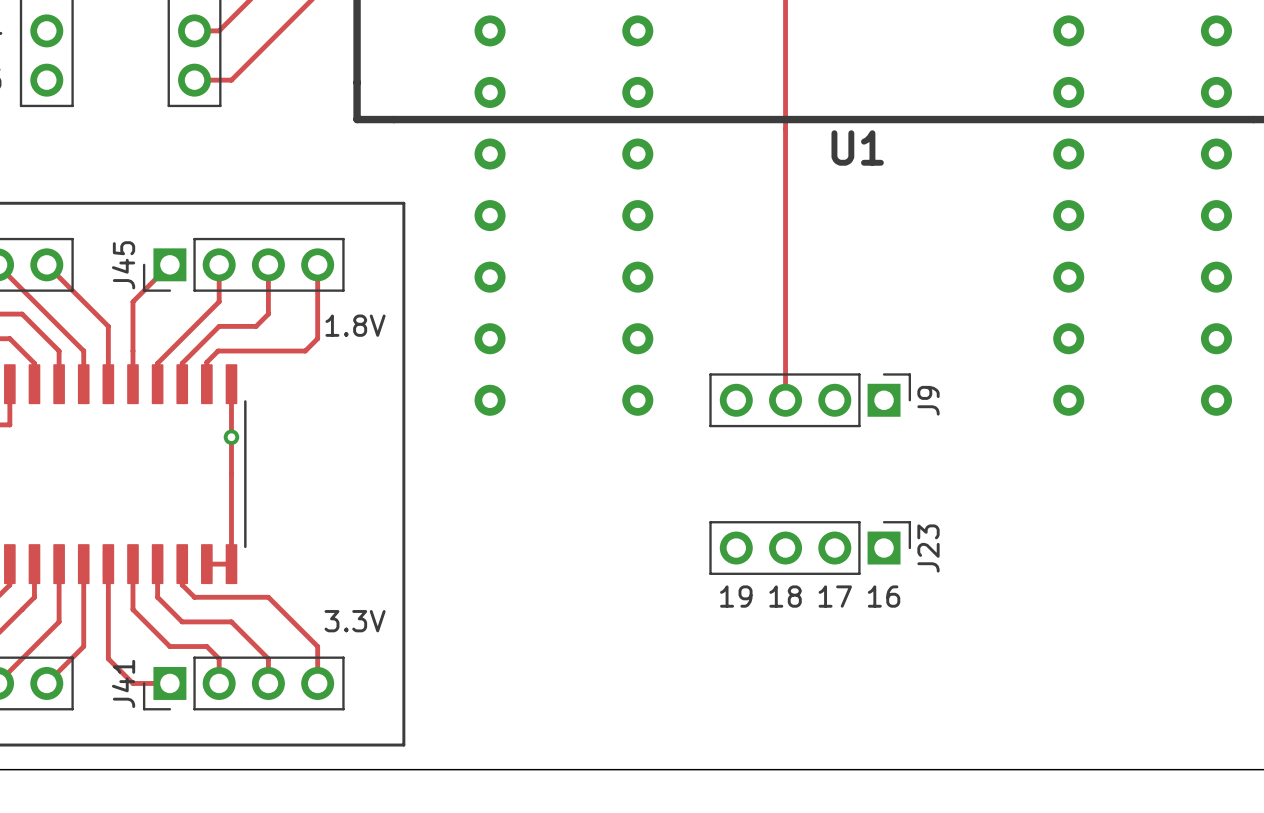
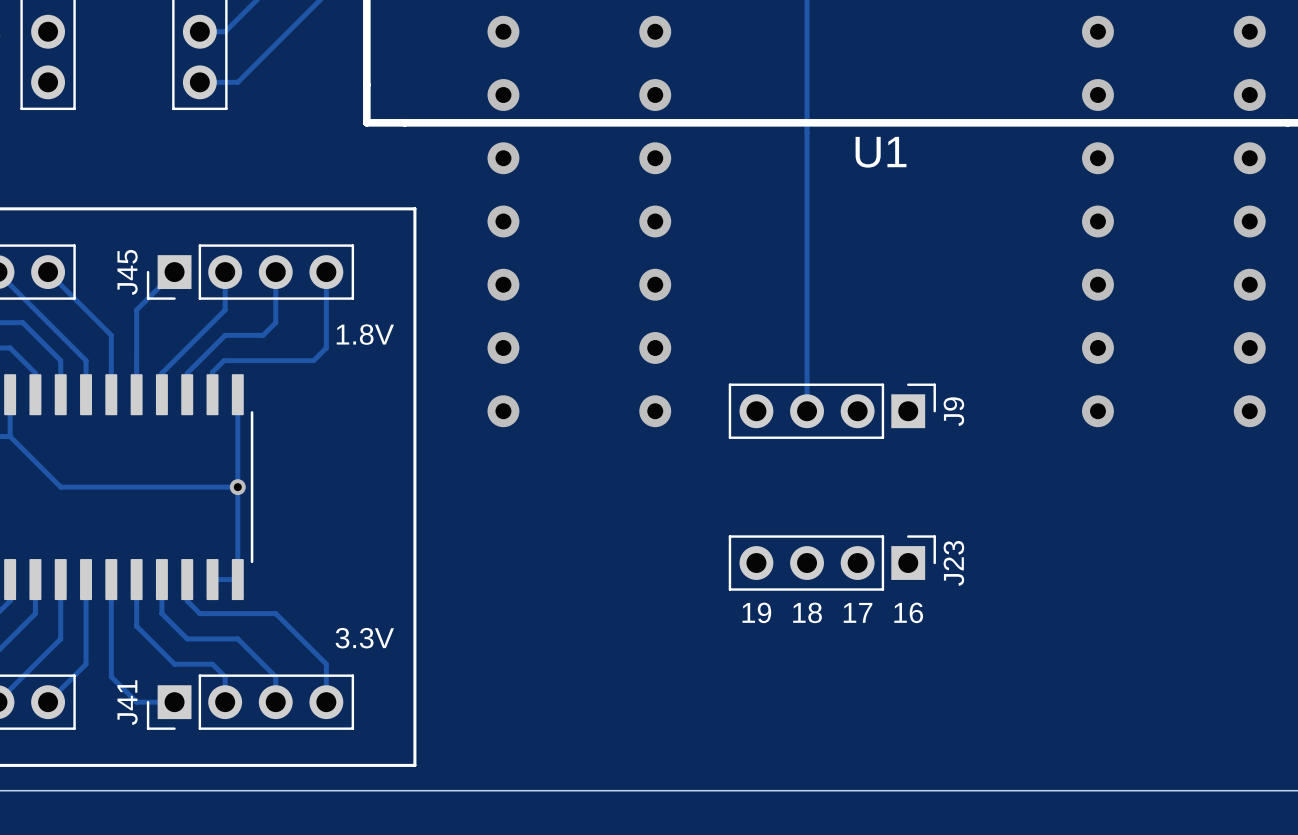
track: none -> (10, 436) (60, 487) (237, 487)
via position: (231, 437) -> (237, 487)

